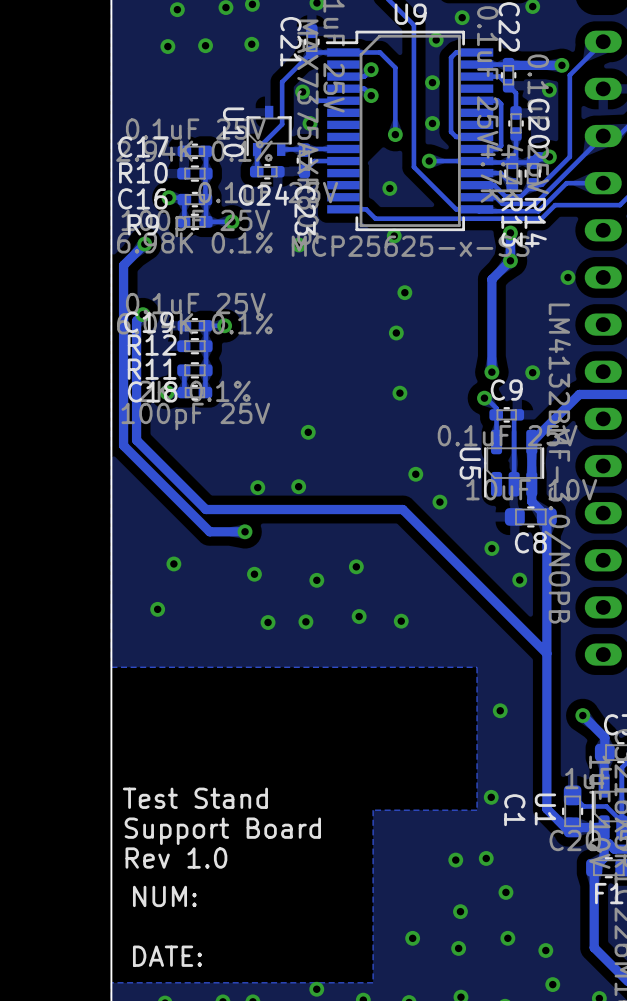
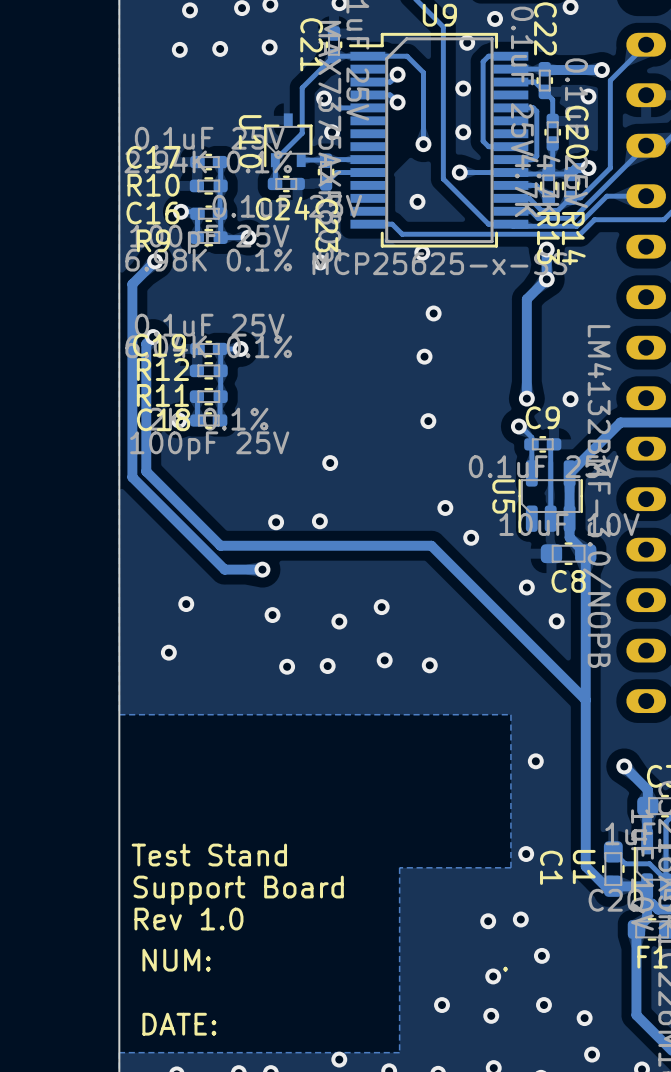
via: (567, 277) -> none
text: NUM: (164, 896) -> NUM: . (325, 960)

